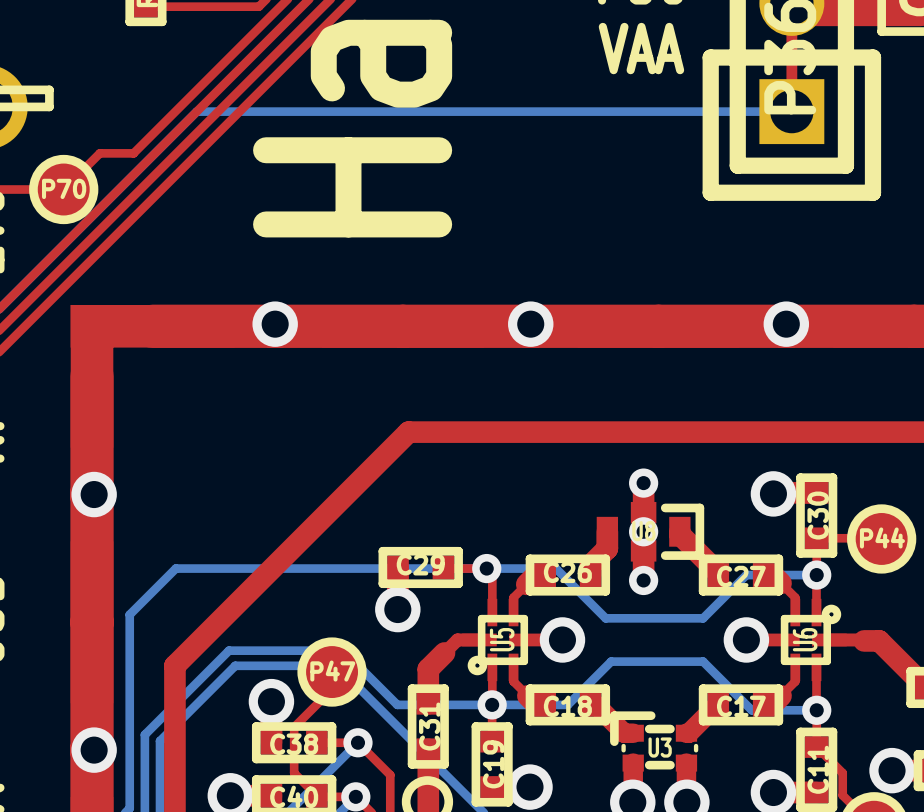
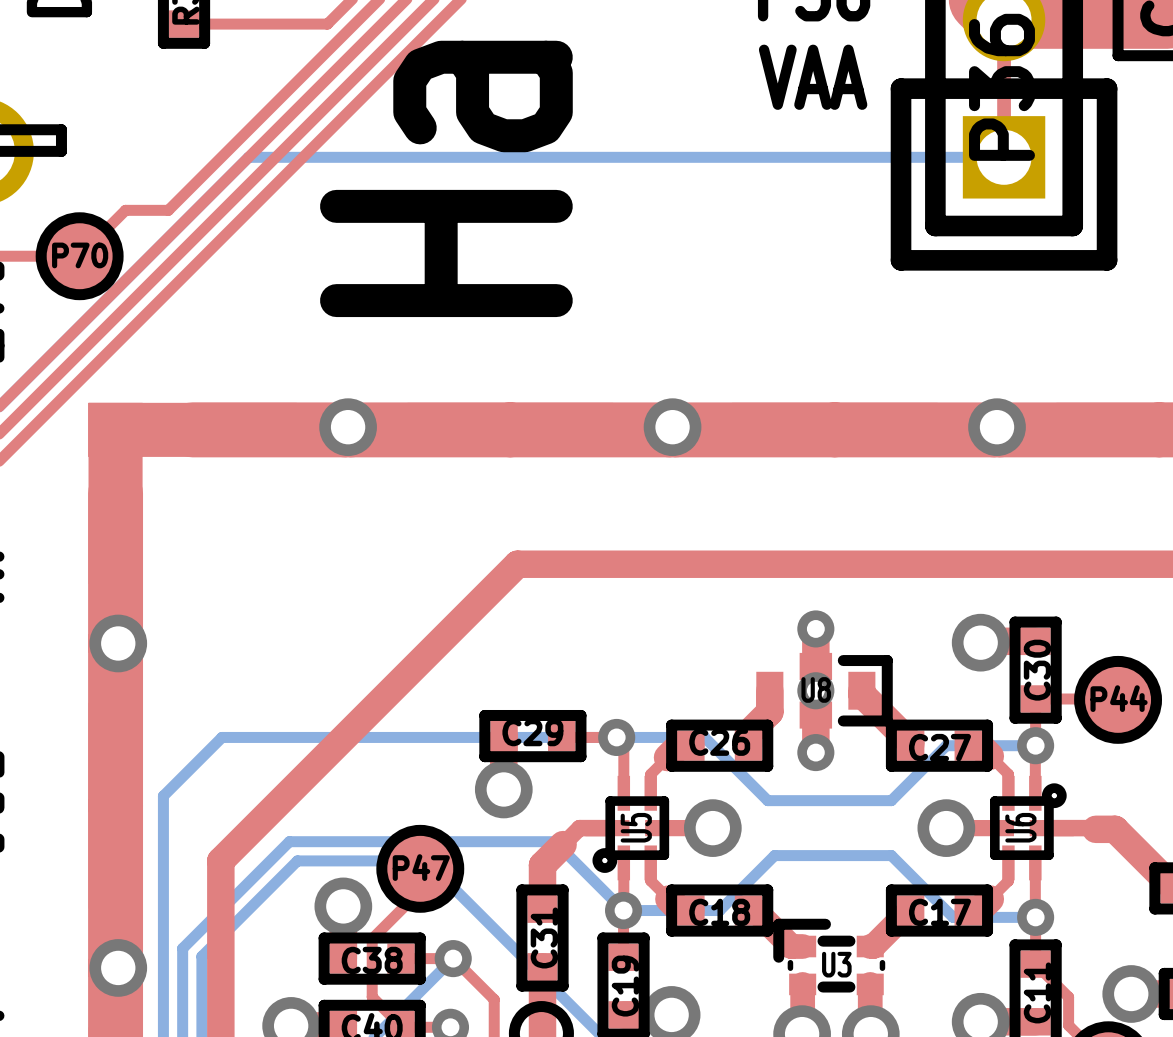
bottom track: (343, 650) (397, 704) (492, 704) -> (434, 841) (554, 841) (623, 910)

